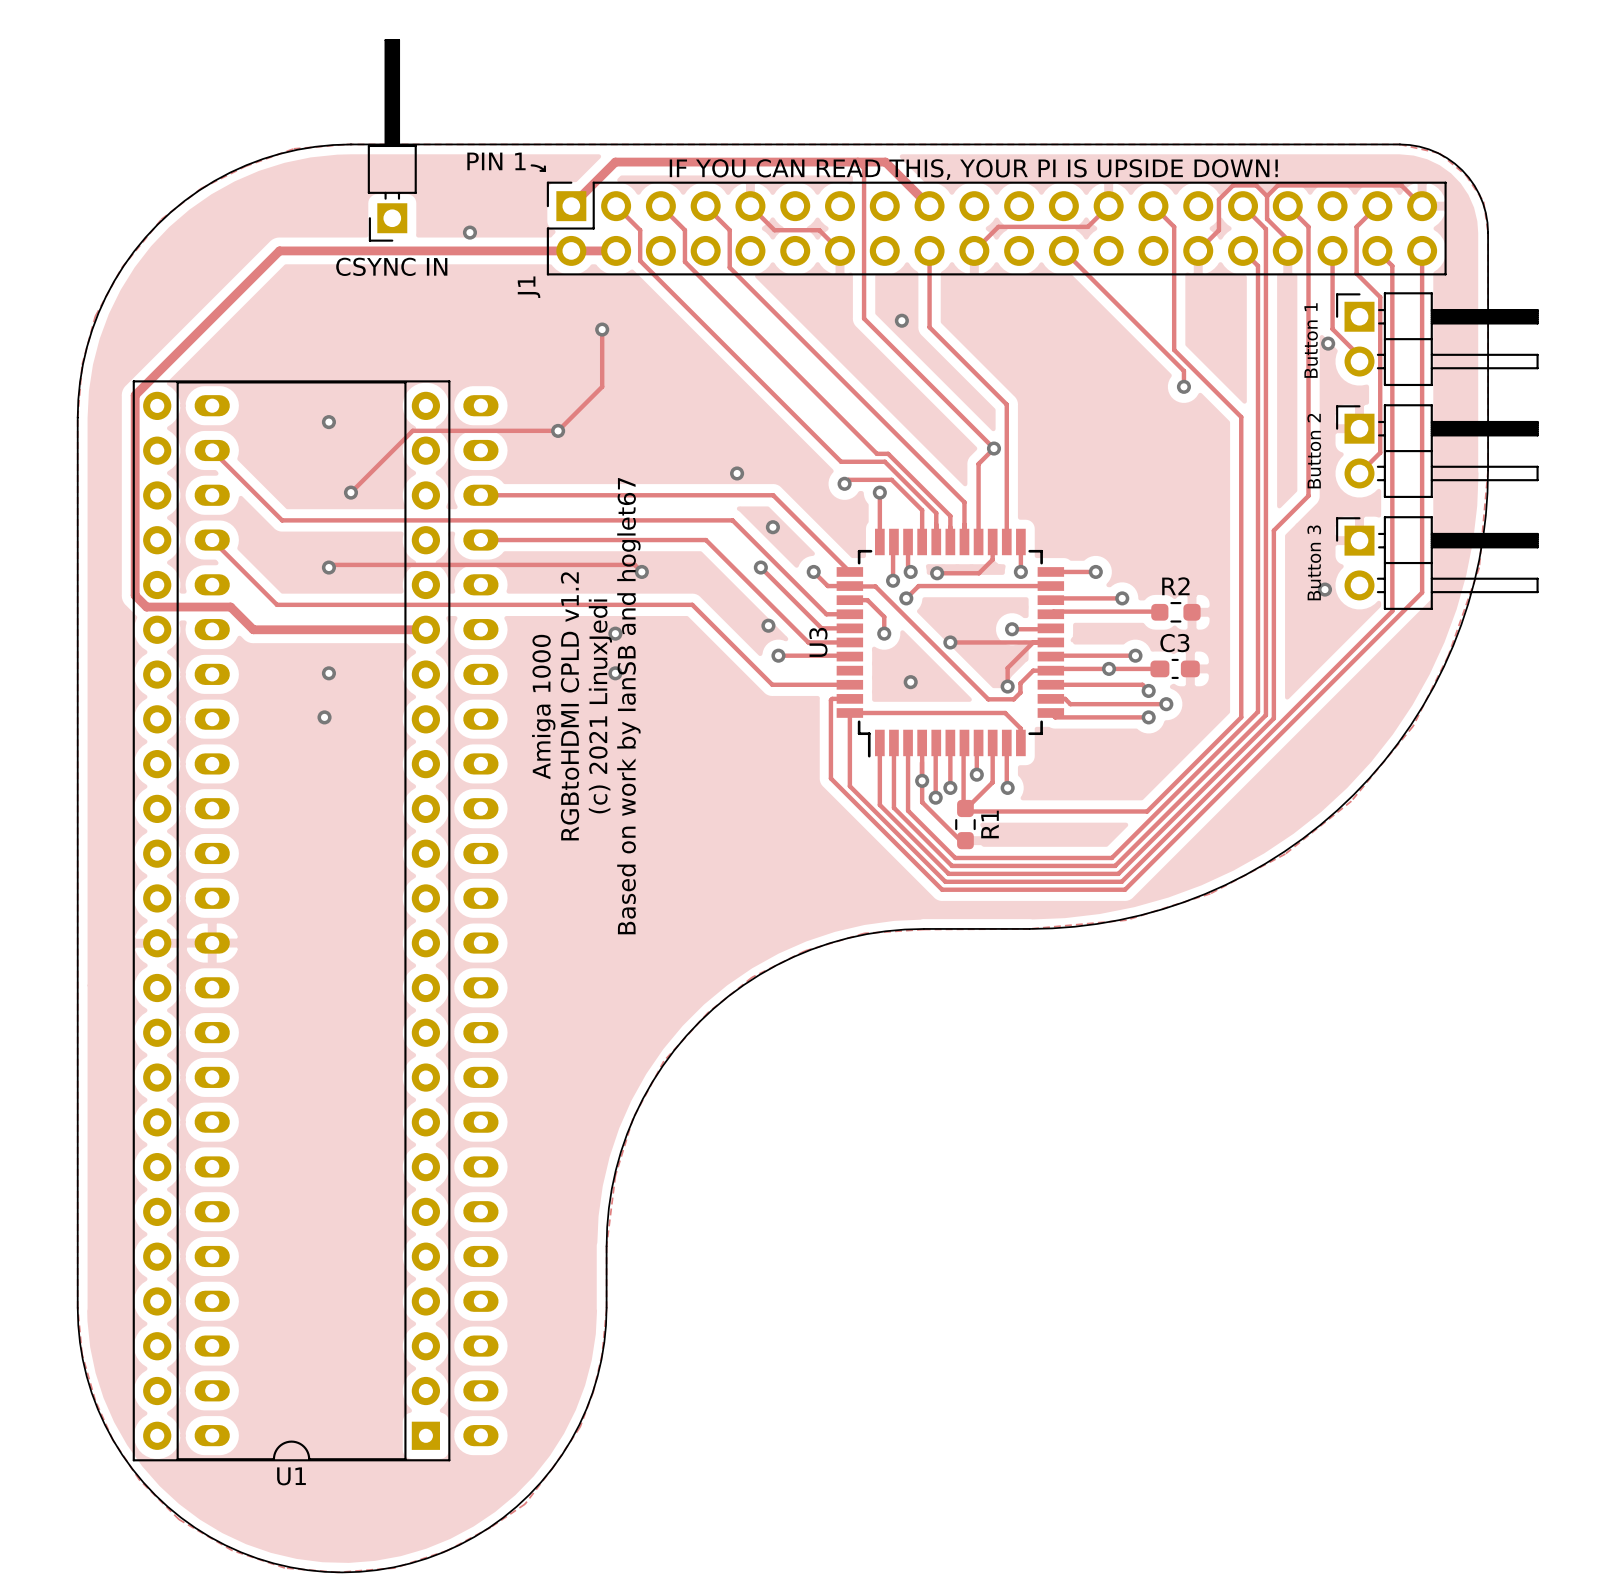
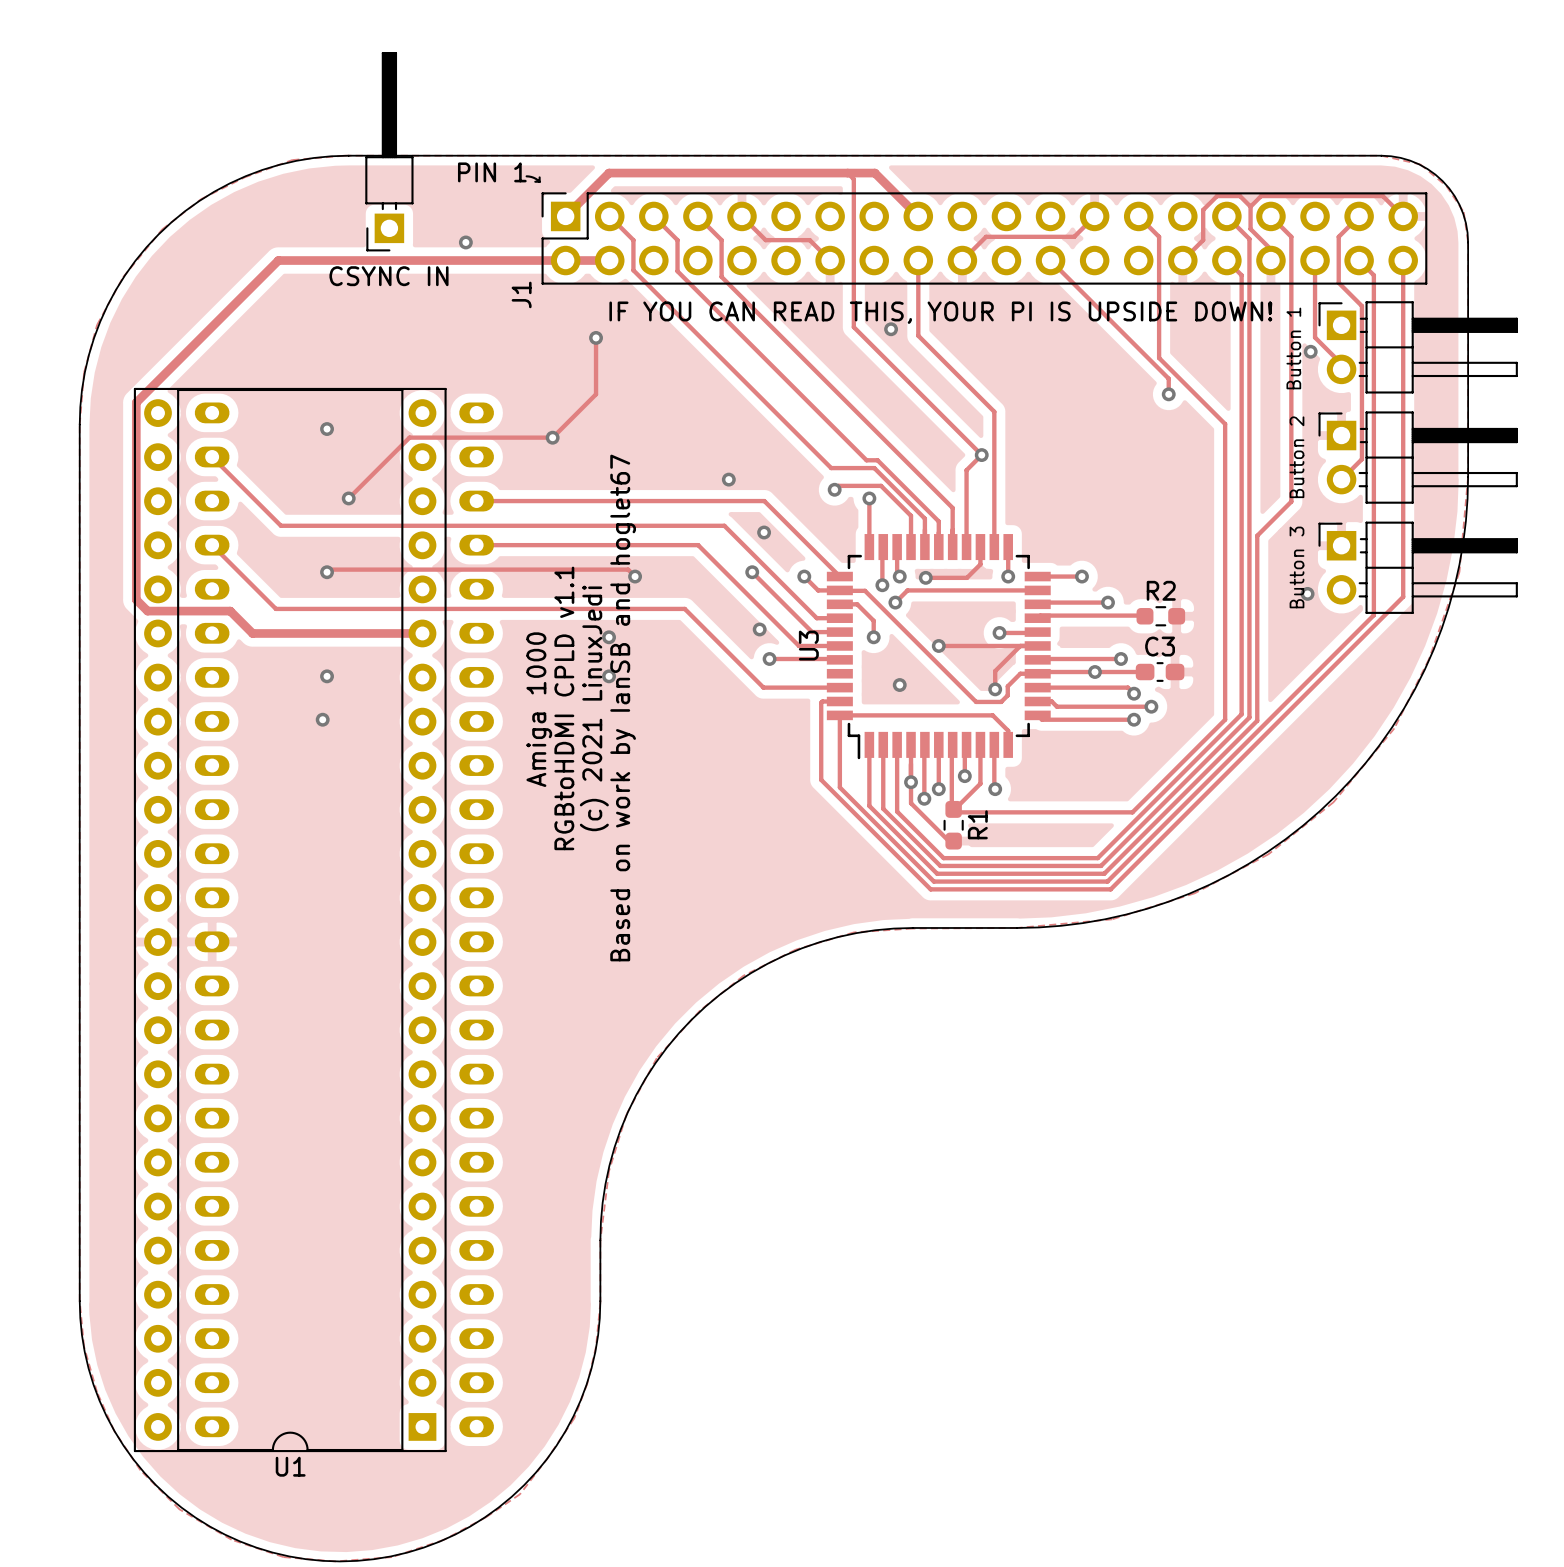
text position: IF YOU CAN READ THIS, YOUR PI IS UPSIDE DOWN! (973, 169) -> IF YOU CAN READ THIS, YOUR PI IS UPSIDE DOWN! (940, 312)
text: RGBtoHDMI CPLD v1.2 (570, 706) -> RGBtoHDMI CPLD v1.1 (564, 708)

